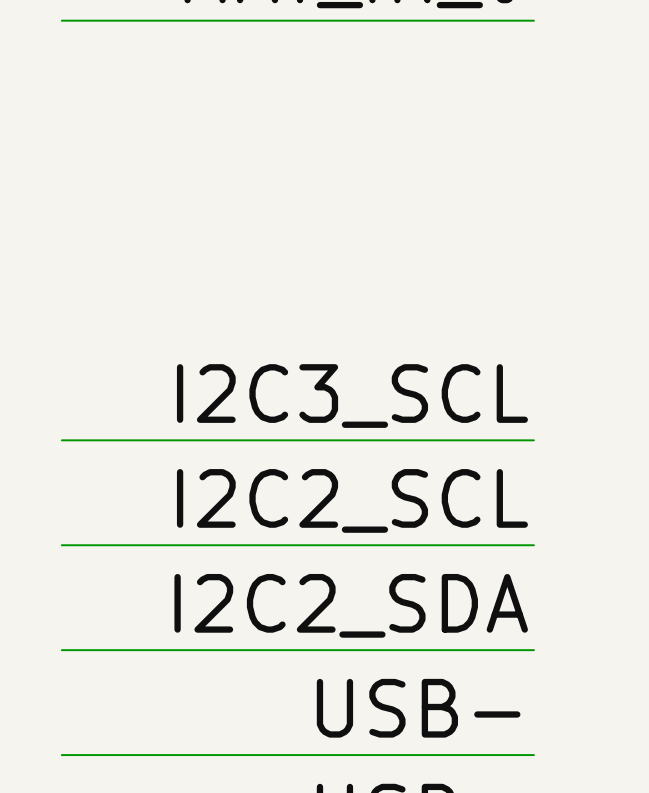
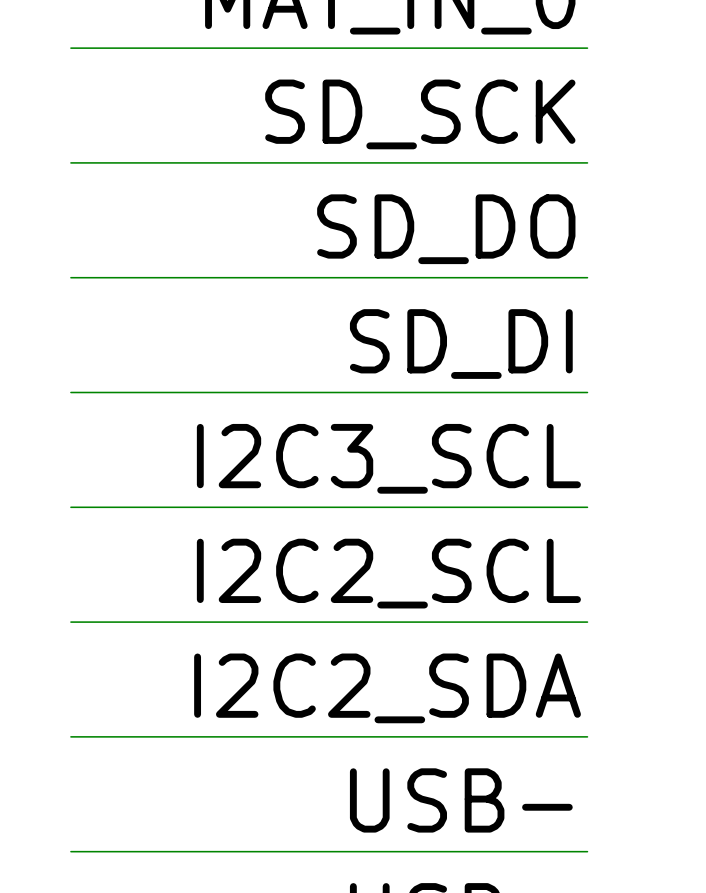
label: none -> SD_SCK (420, 114)
wire: none -> (70, 162) (587, 162)
label: none -> SD_DO (446, 229)
wire: none -> (70, 277) (587, 277)
label: none -> SD_DI (461, 344)
wire: none -> (70, 392) (587, 392)

